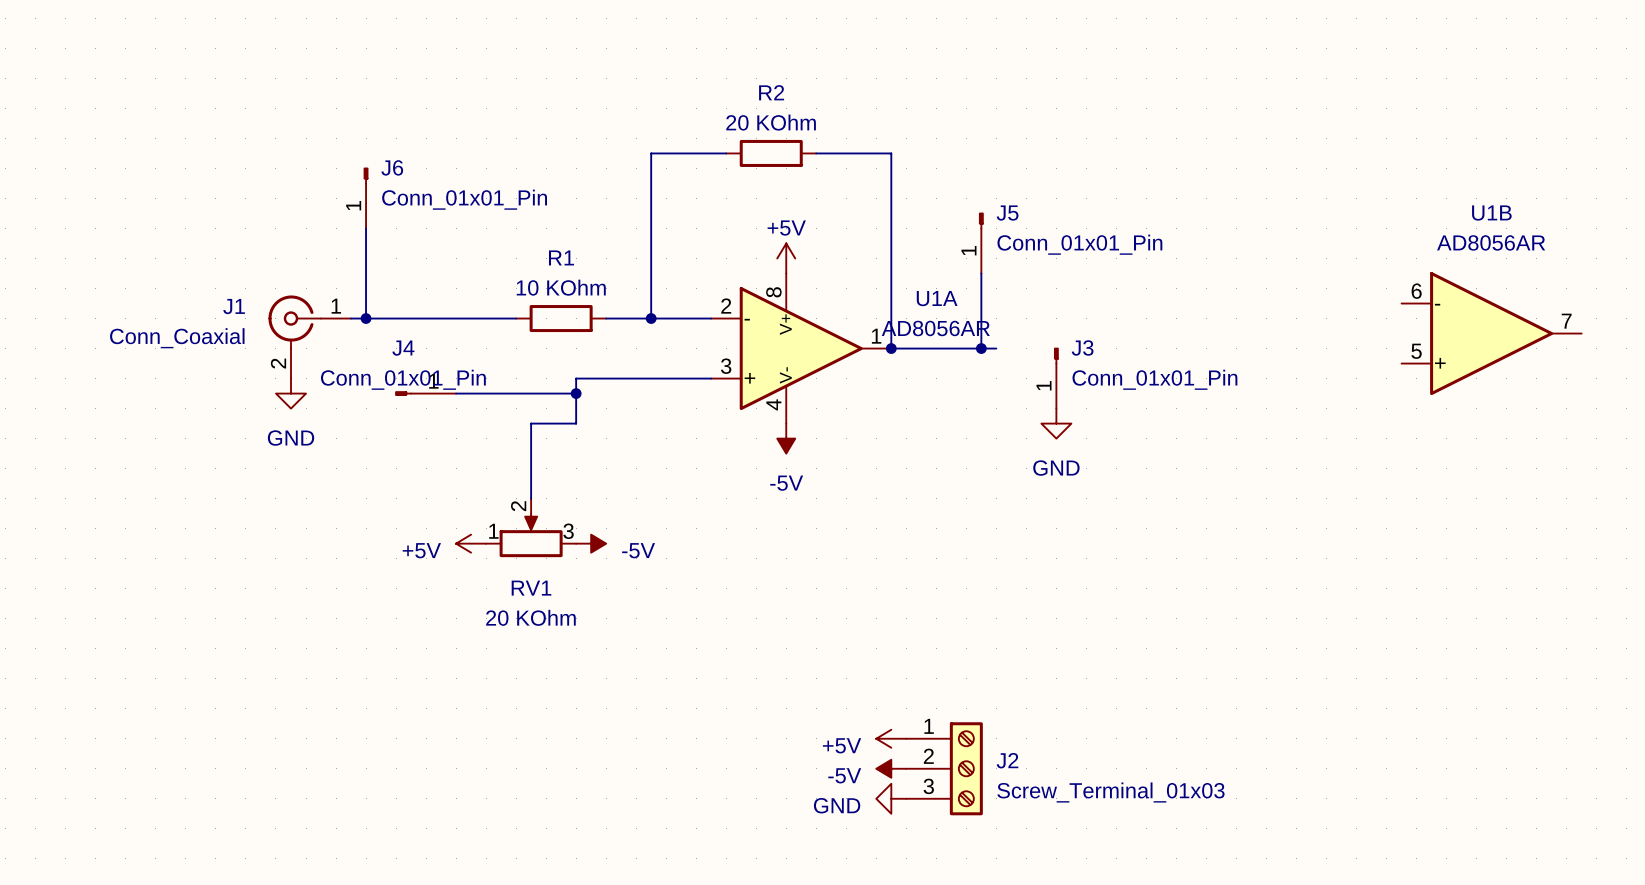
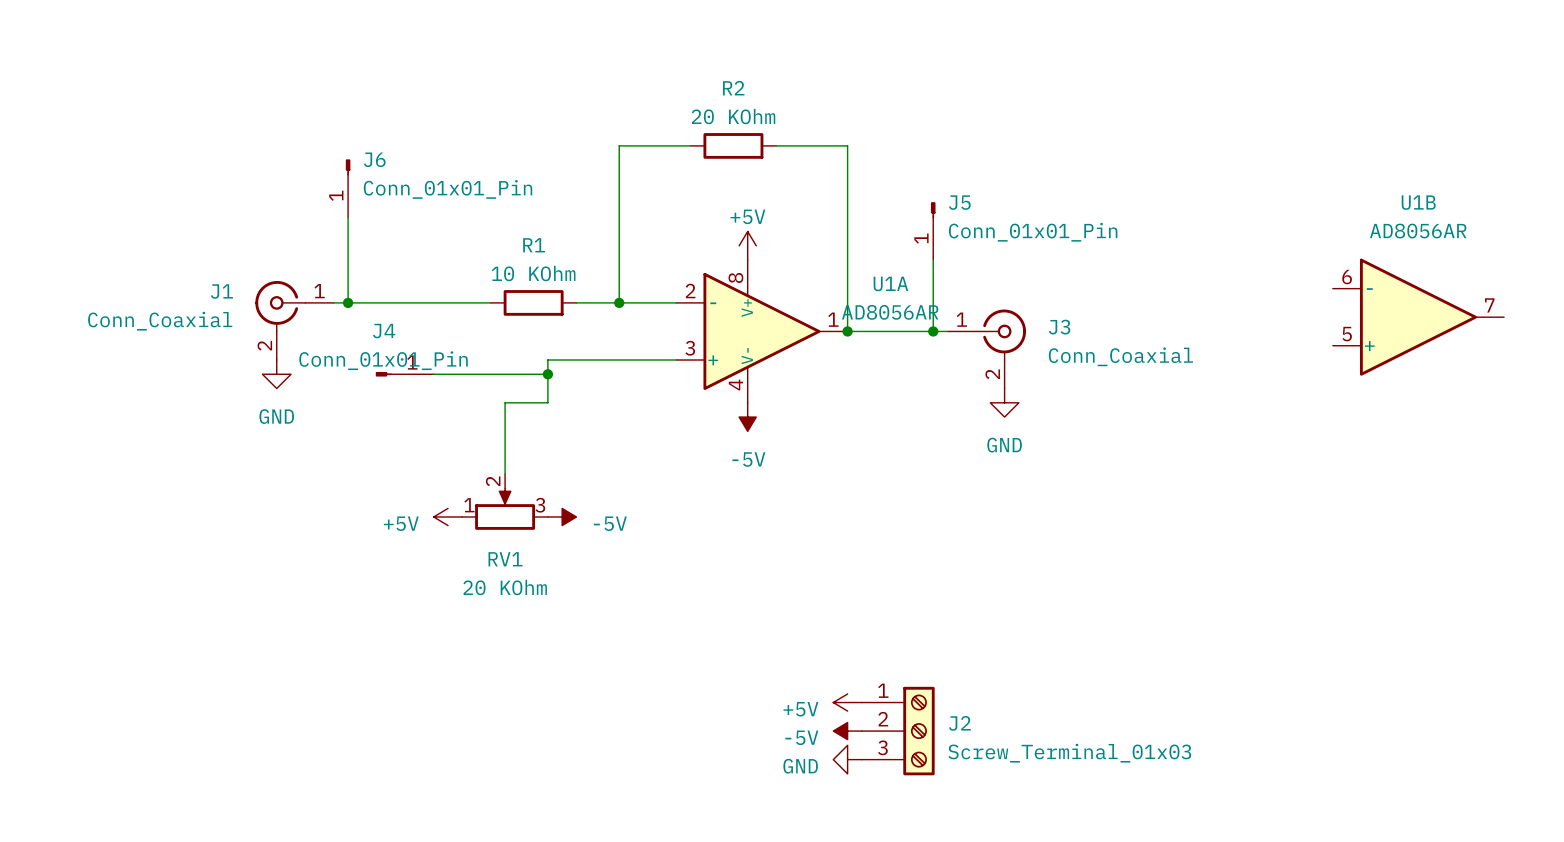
J3 symbol: [1053, 347, 1059, 409] -> [947, 309, 1027, 389]
J3 name position: J3 (1082, 347) -> J3 (1059, 327)
J3 value: Conn_01x01_Pin (1154, 379) -> Conn_Coaxial (1120, 356)

